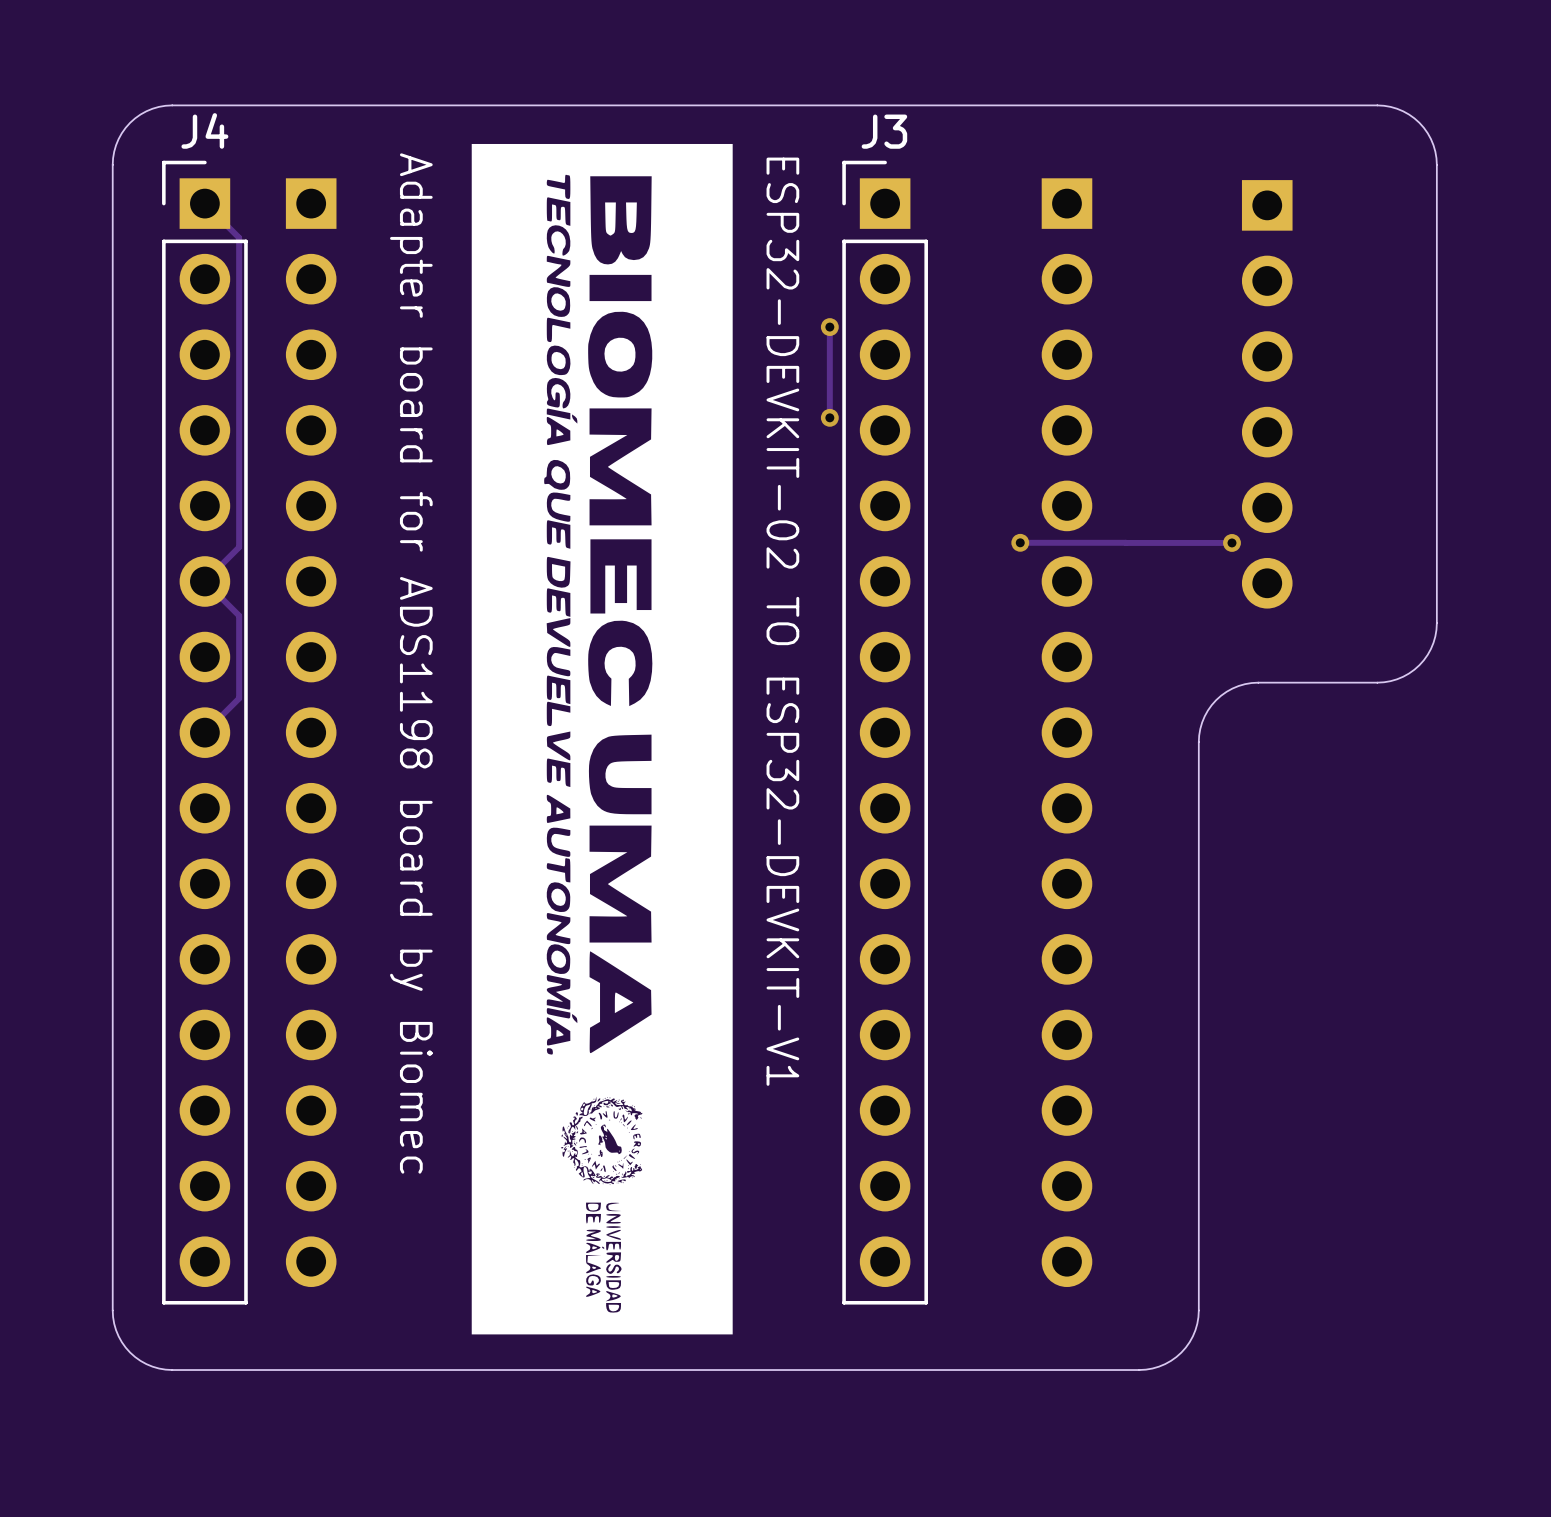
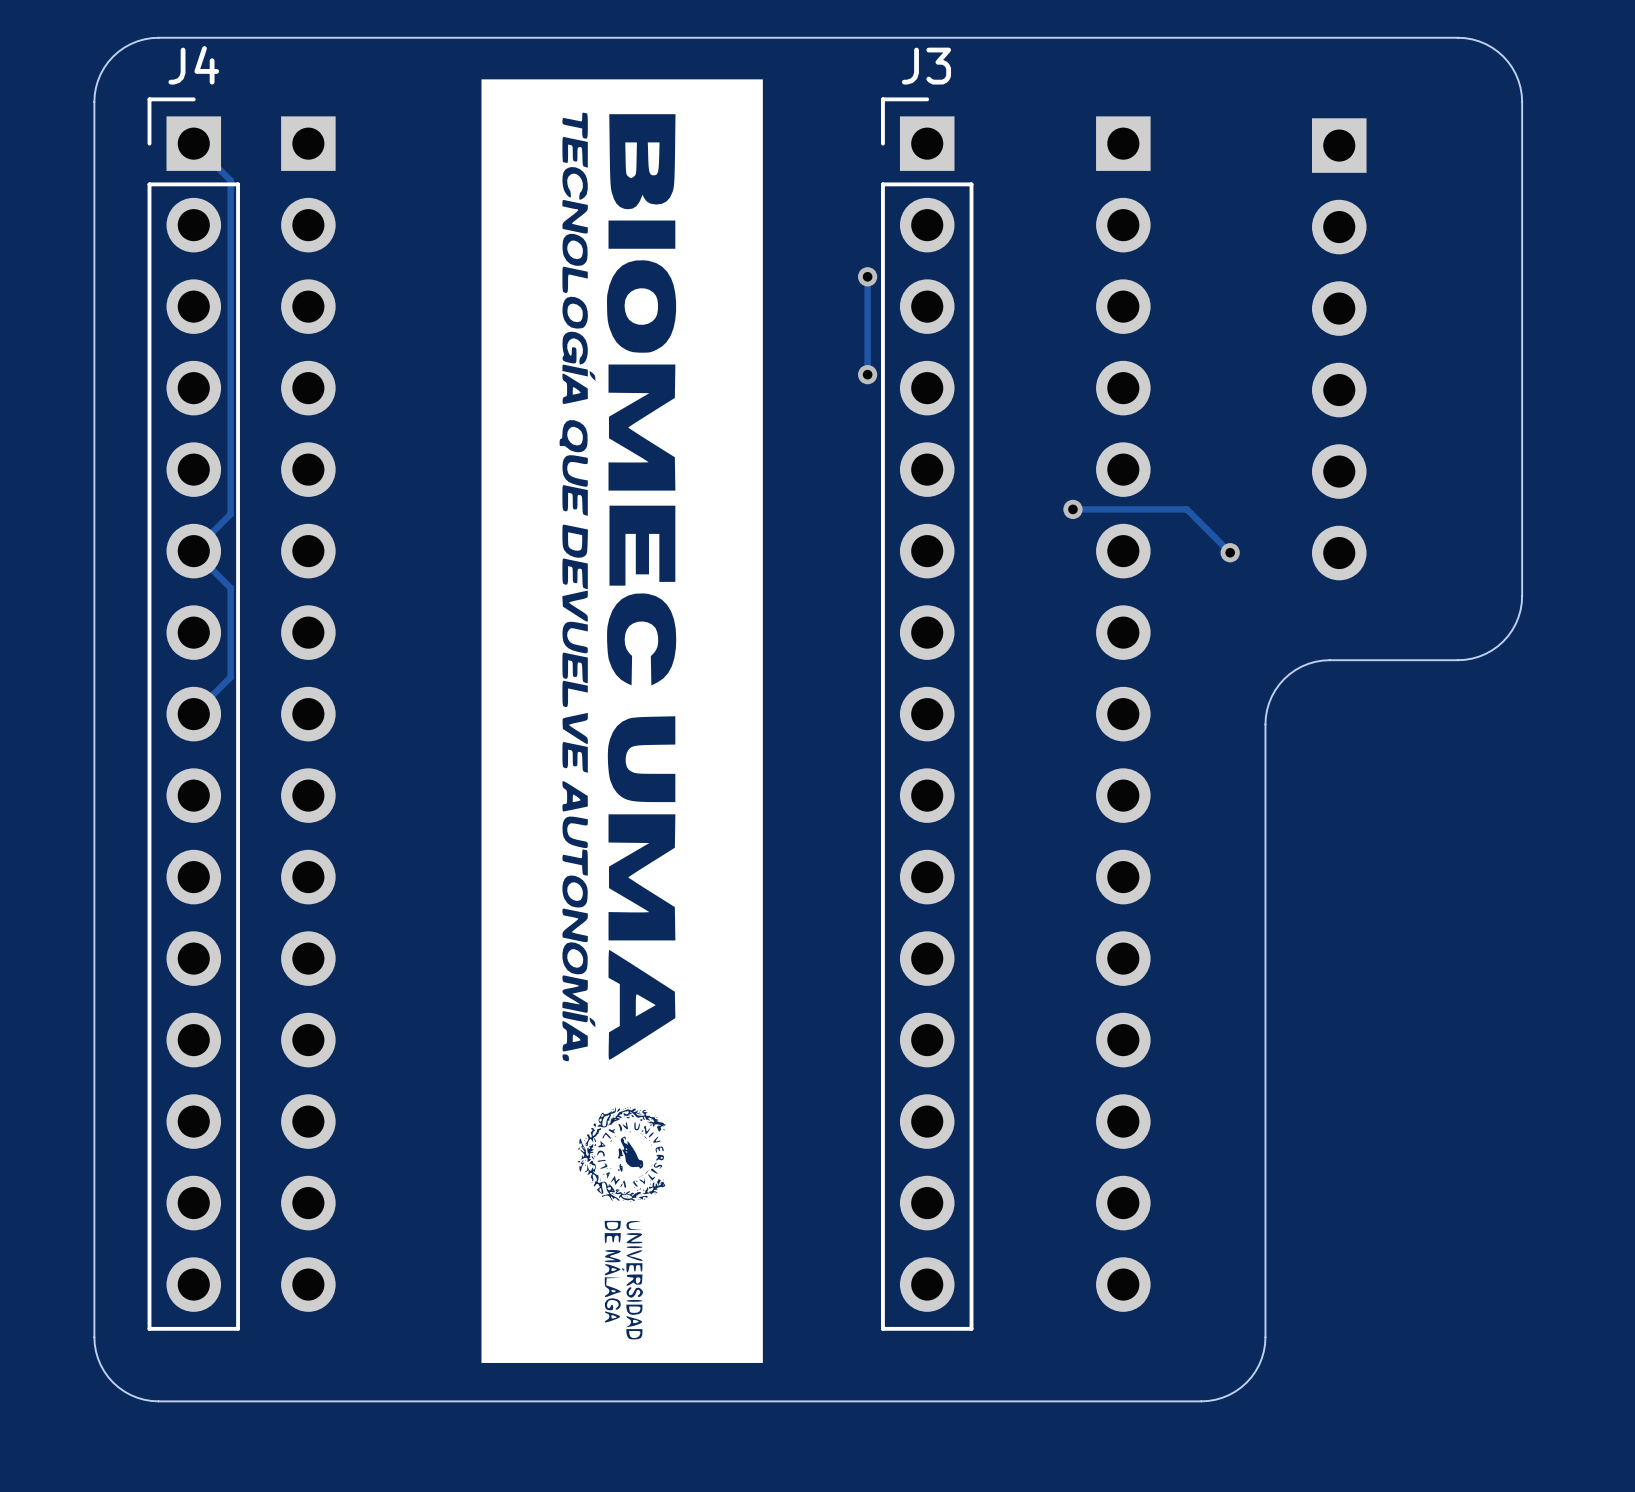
track: (1231, 542) (1126, 542) -> (1230, 552) (1187, 509)
via position: (1231, 542) -> (1230, 552)
text: ESP32-DEVKIT-02 TO ESP32-DEVKIT-V1 (782, 621) -> none
text: Adapter board for ADS1198 board by Biomec (411, 663) -> none

